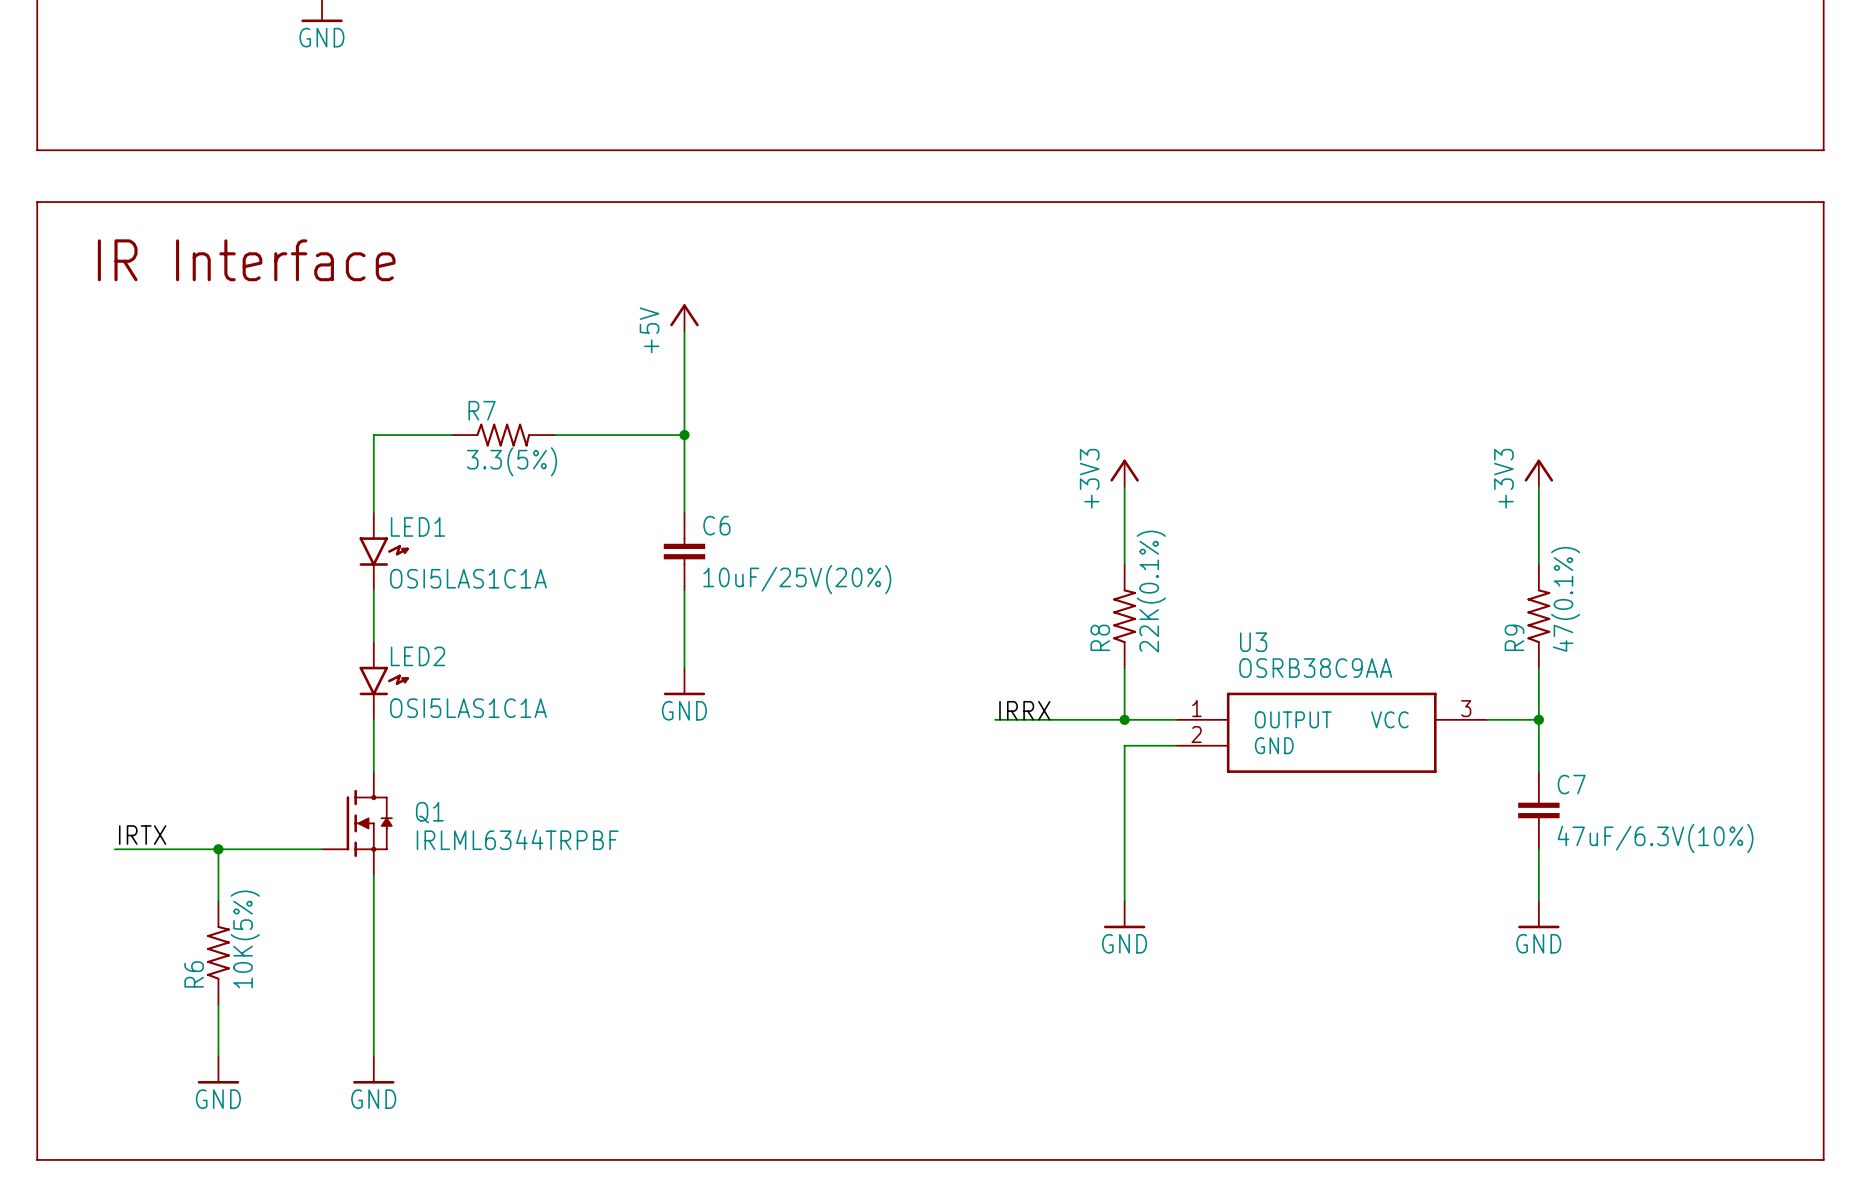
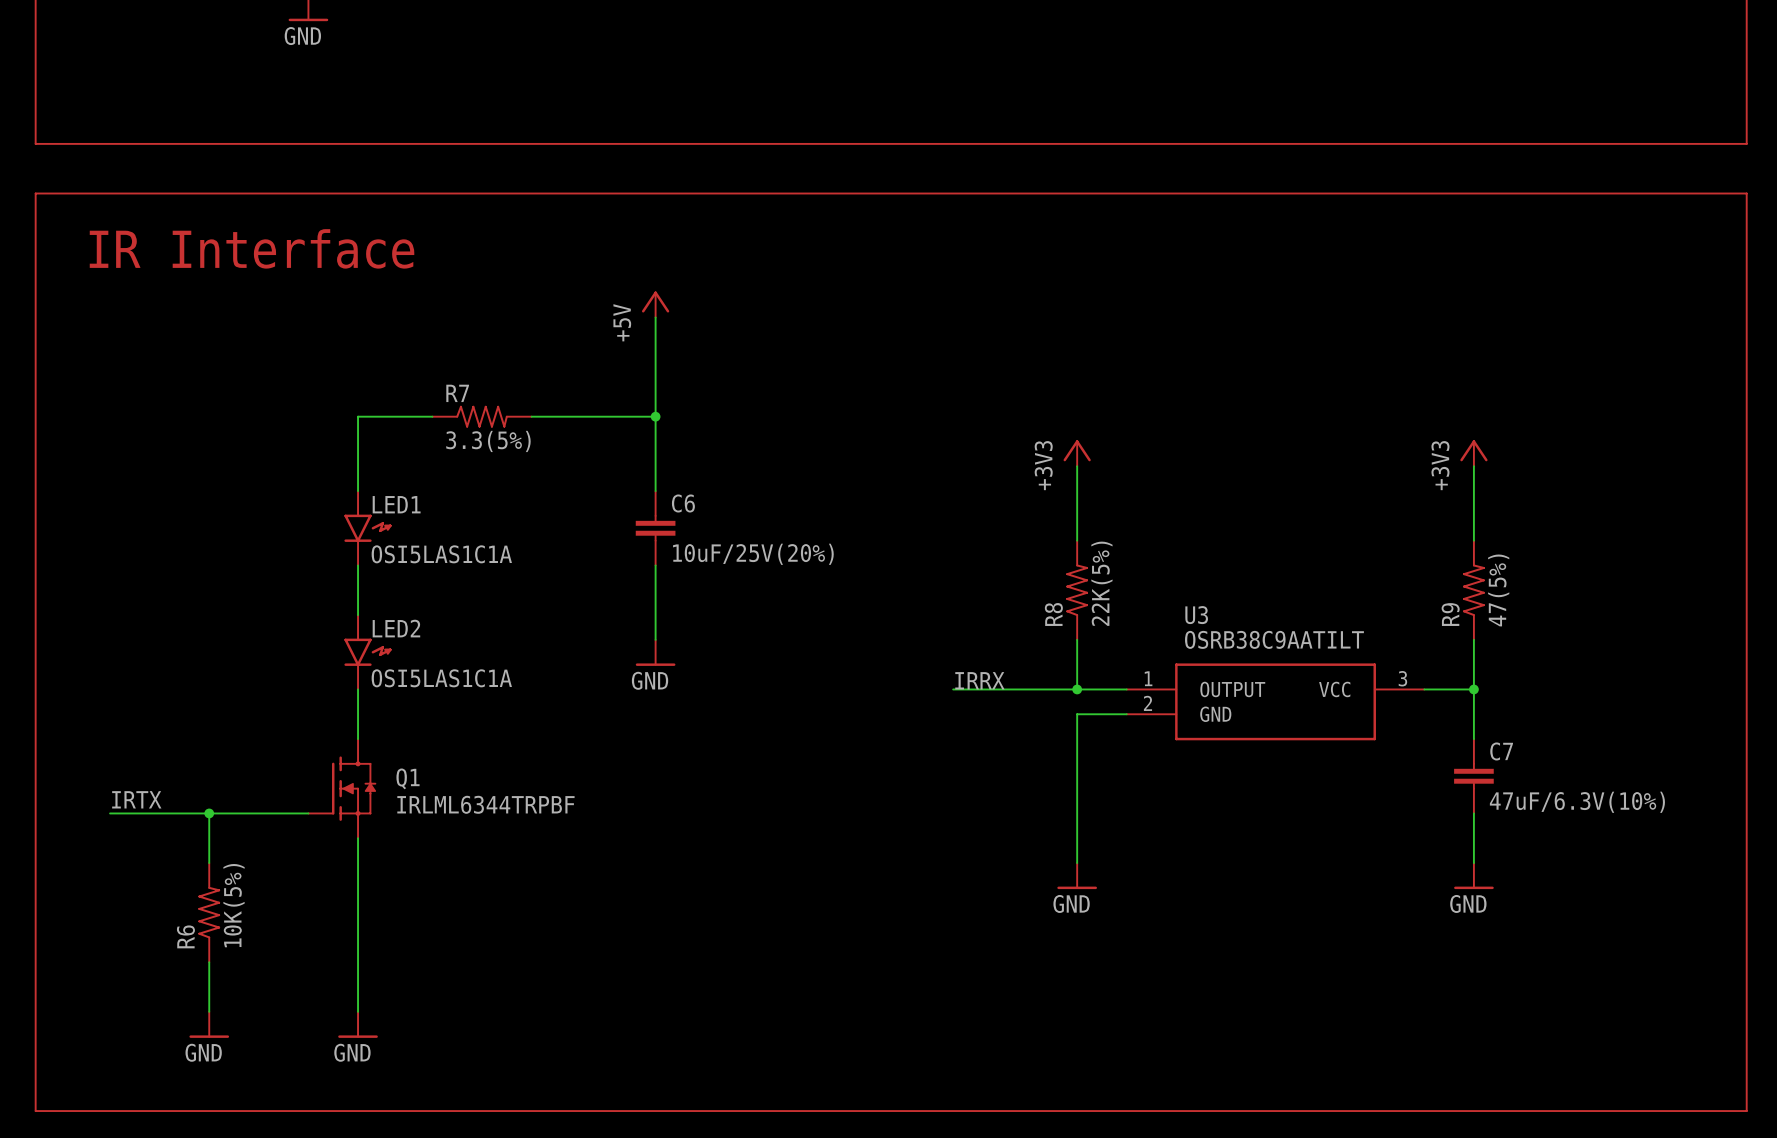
R8 value: 22K(0.1%) (1151, 591) -> 22K(5%) (1101, 583)
R9 value: 47(0.1%) (1565, 599) -> 47(5%) (1498, 590)
U3 value: OSRB38C9AA (1315, 668) -> OSRB38C9AATILT (1274, 639)

